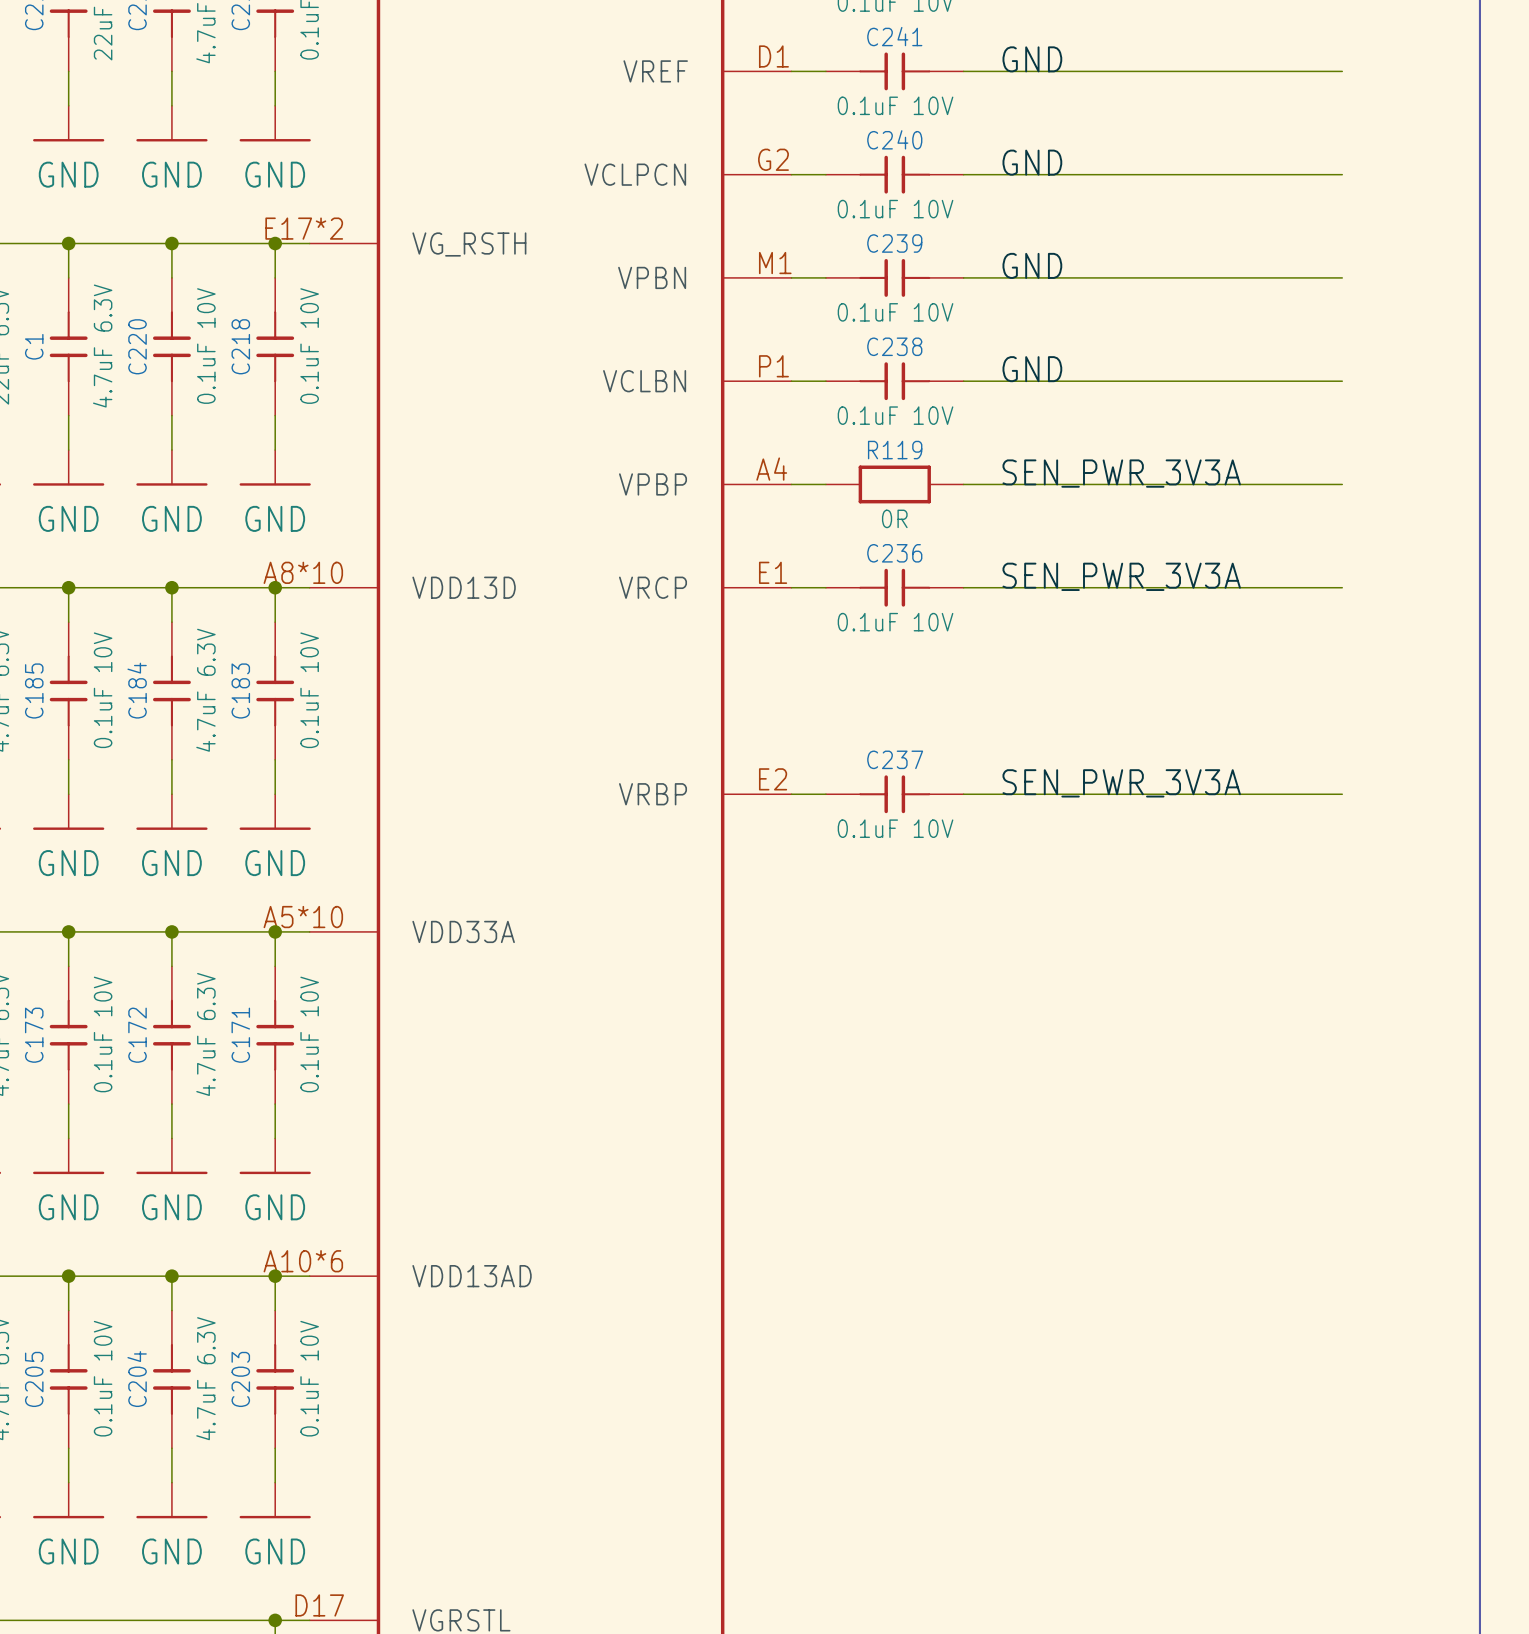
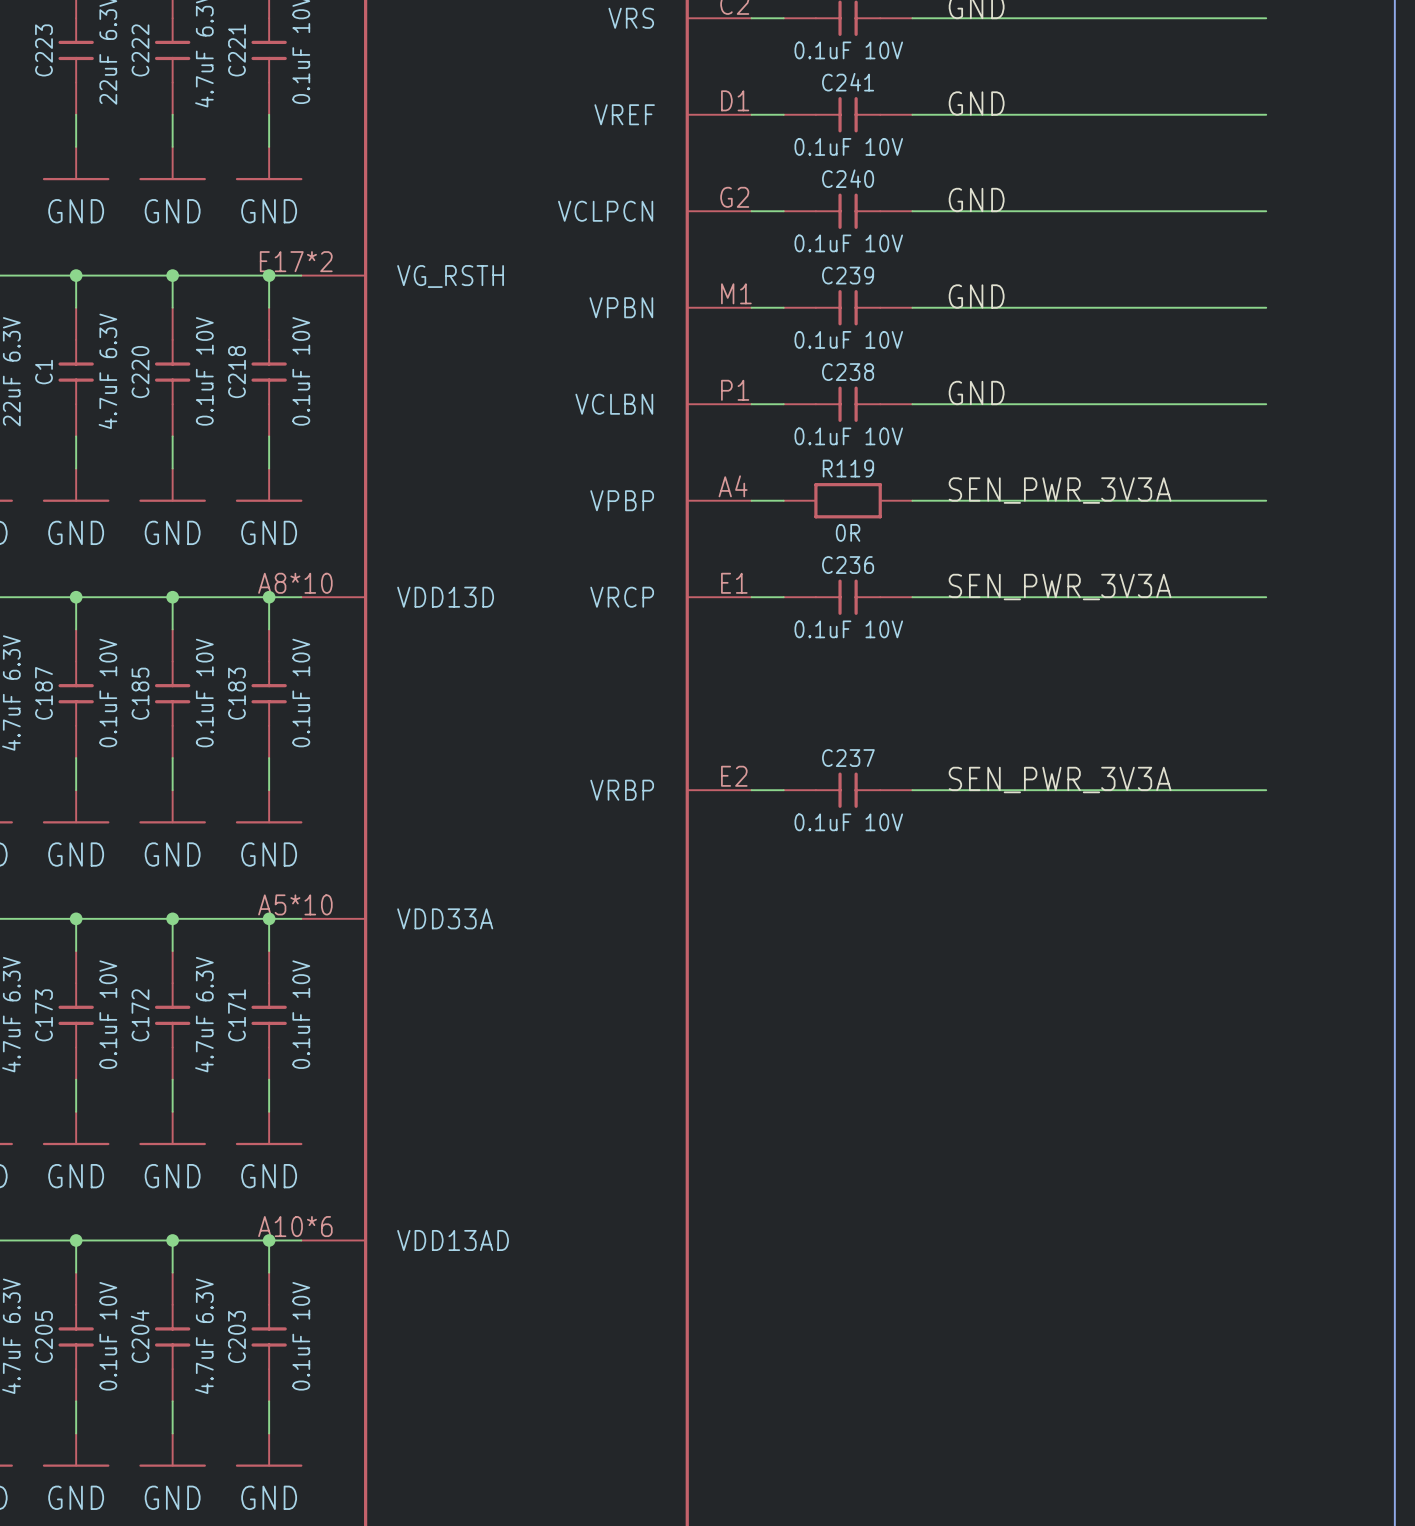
C185 name: C185 (34, 690) -> C187 (43, 693)
C184 name: C184 (137, 690) -> C185 (140, 693)
C184 value: 4.7uF 6.3V (205, 690) -> 0.1uF 10V (204, 693)

